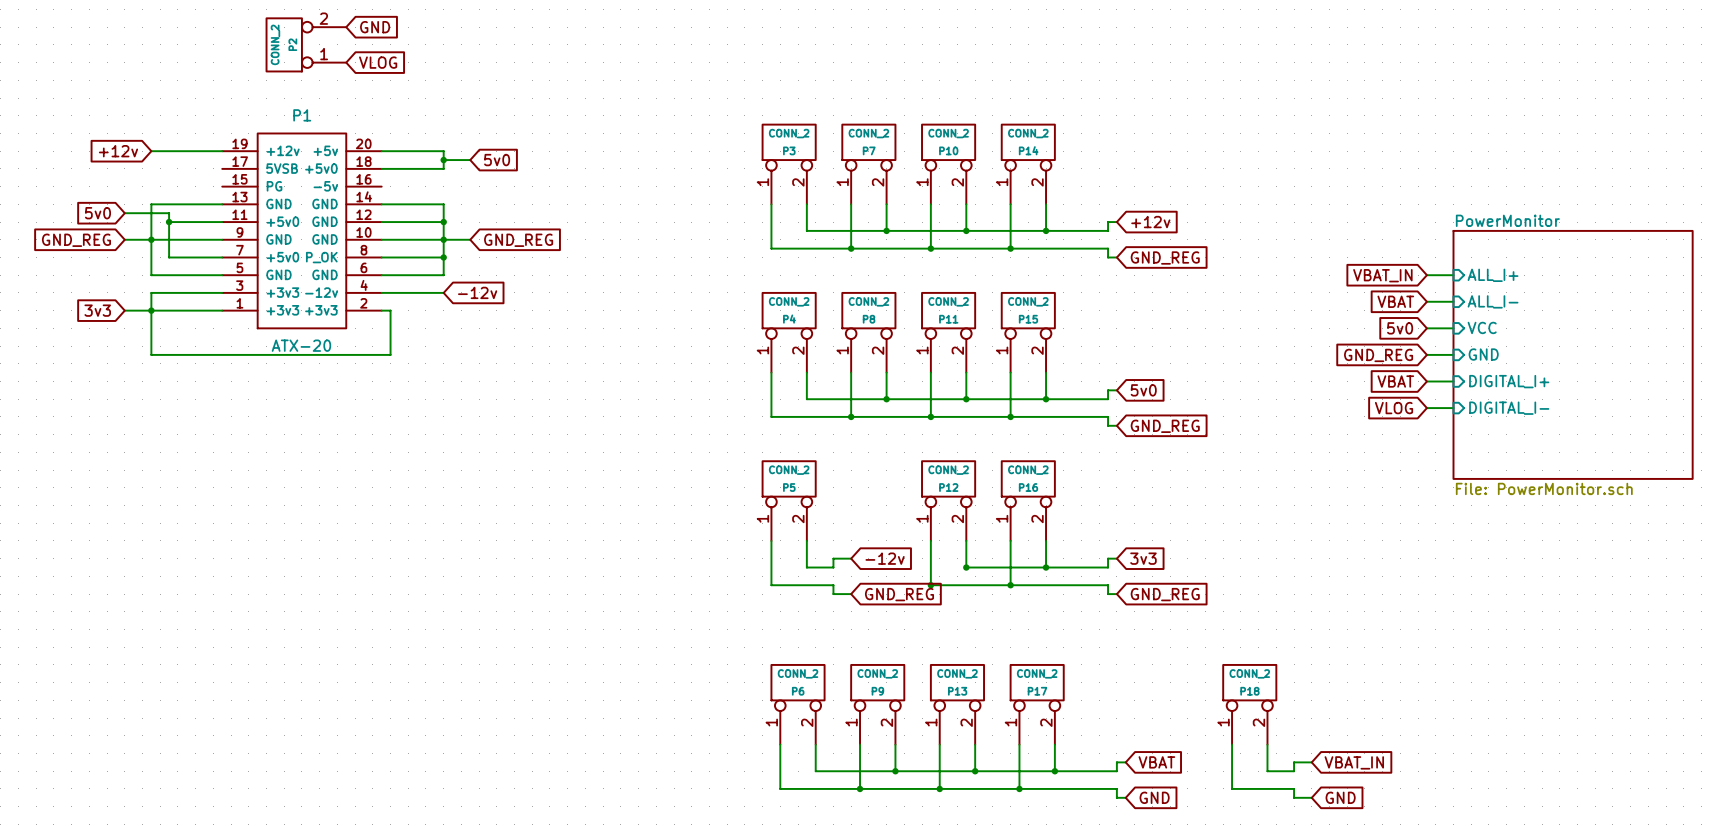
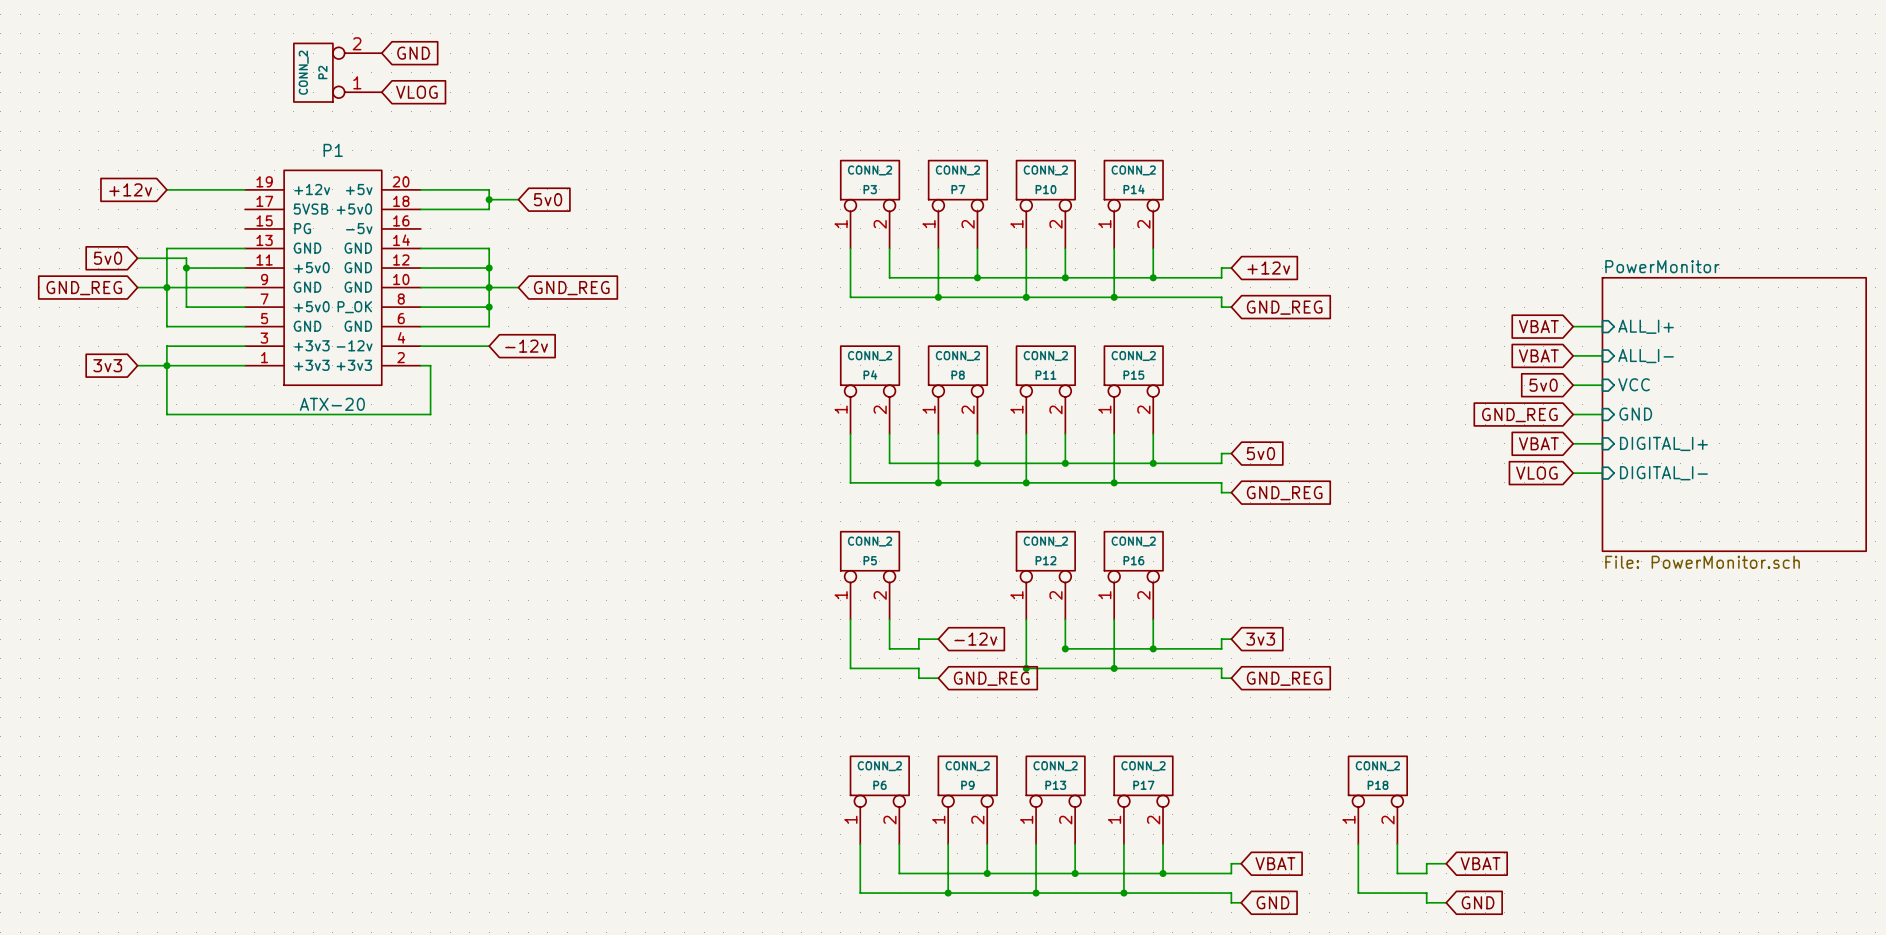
global label: VBAT_IN (1382, 275) -> VBAT (1538, 326)
global label: VBAT_IN (1354, 762) -> VBAT (1480, 863)

